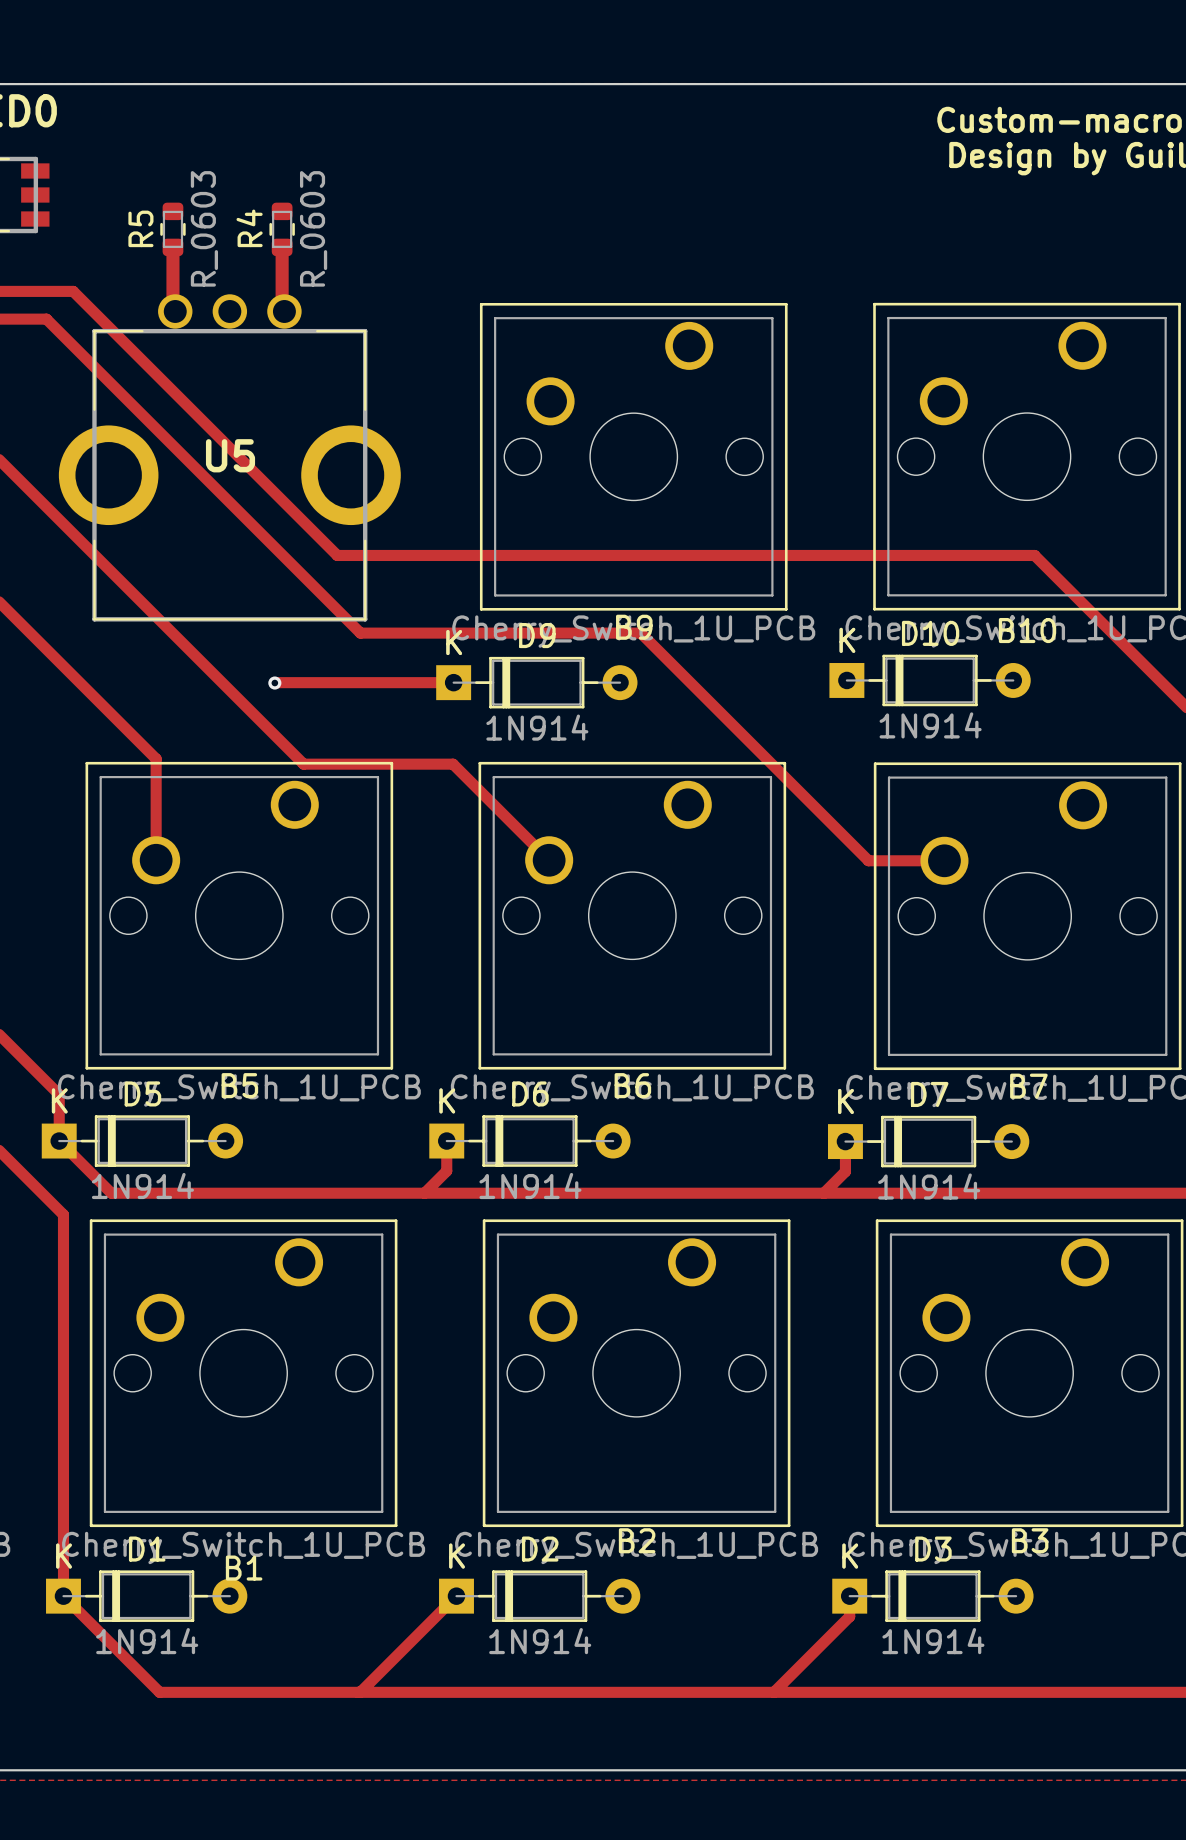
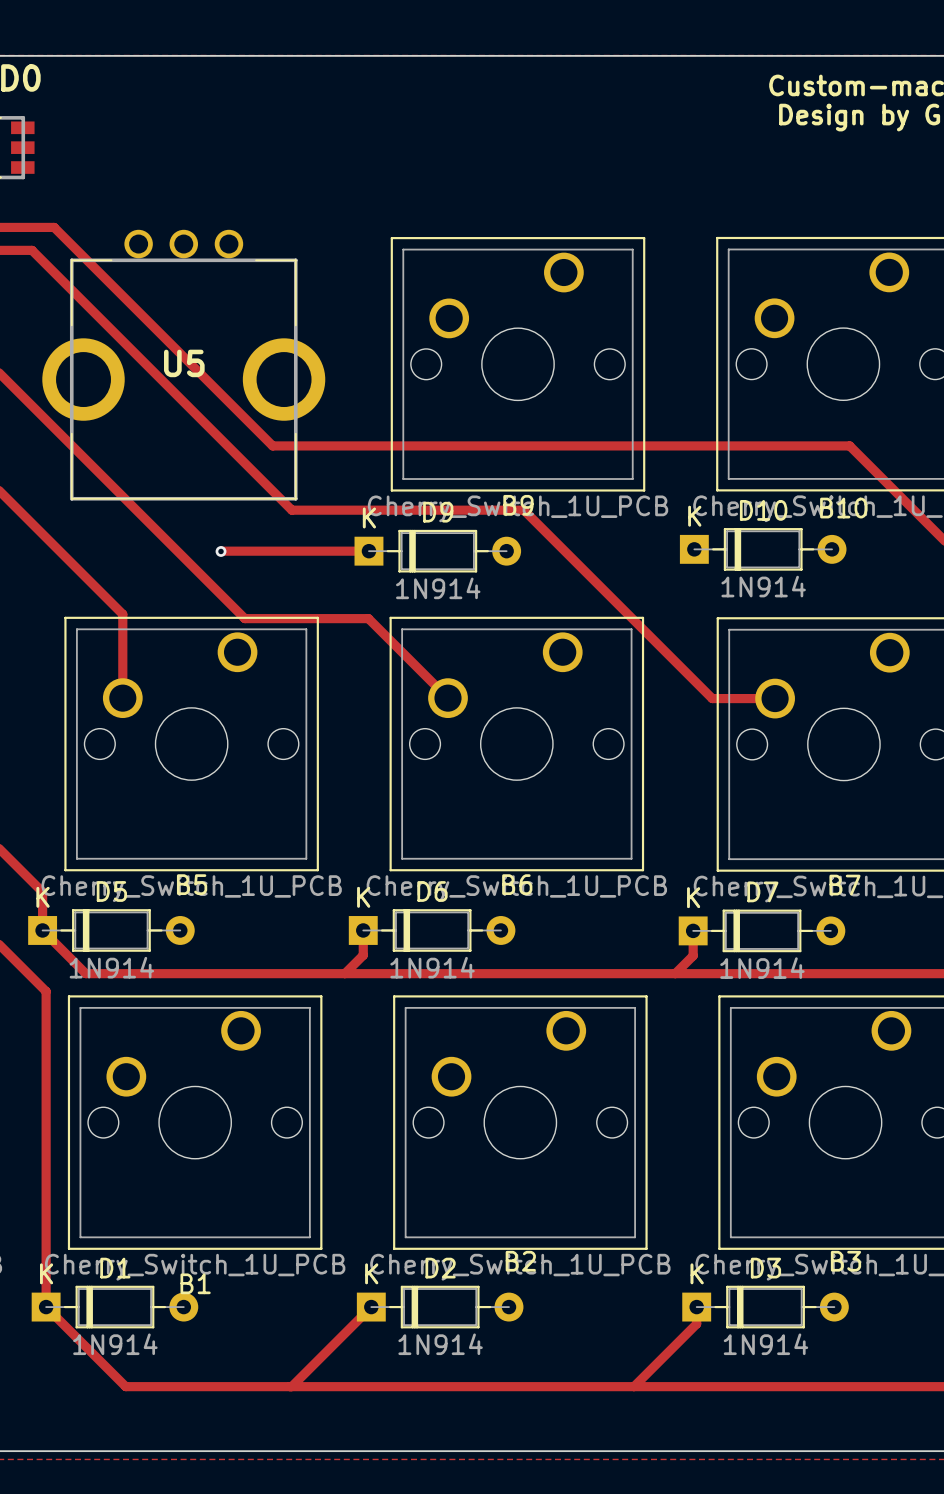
R5: R_0603 (172, 229) -> none
R4: R_0603 (282, 229) -> none
track: (172, 247) (172, 309) (175, 311) -> none
track: (282, 247) (282, 309) (284, 311) -> none

